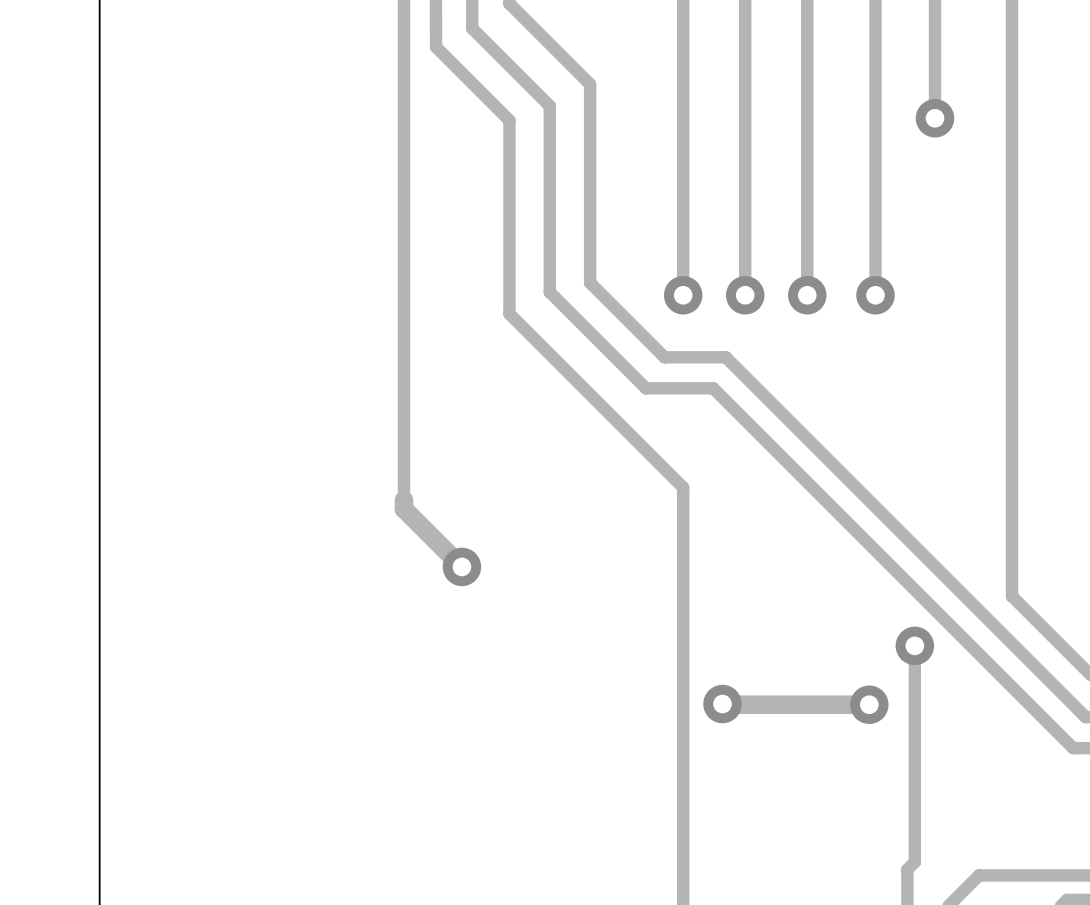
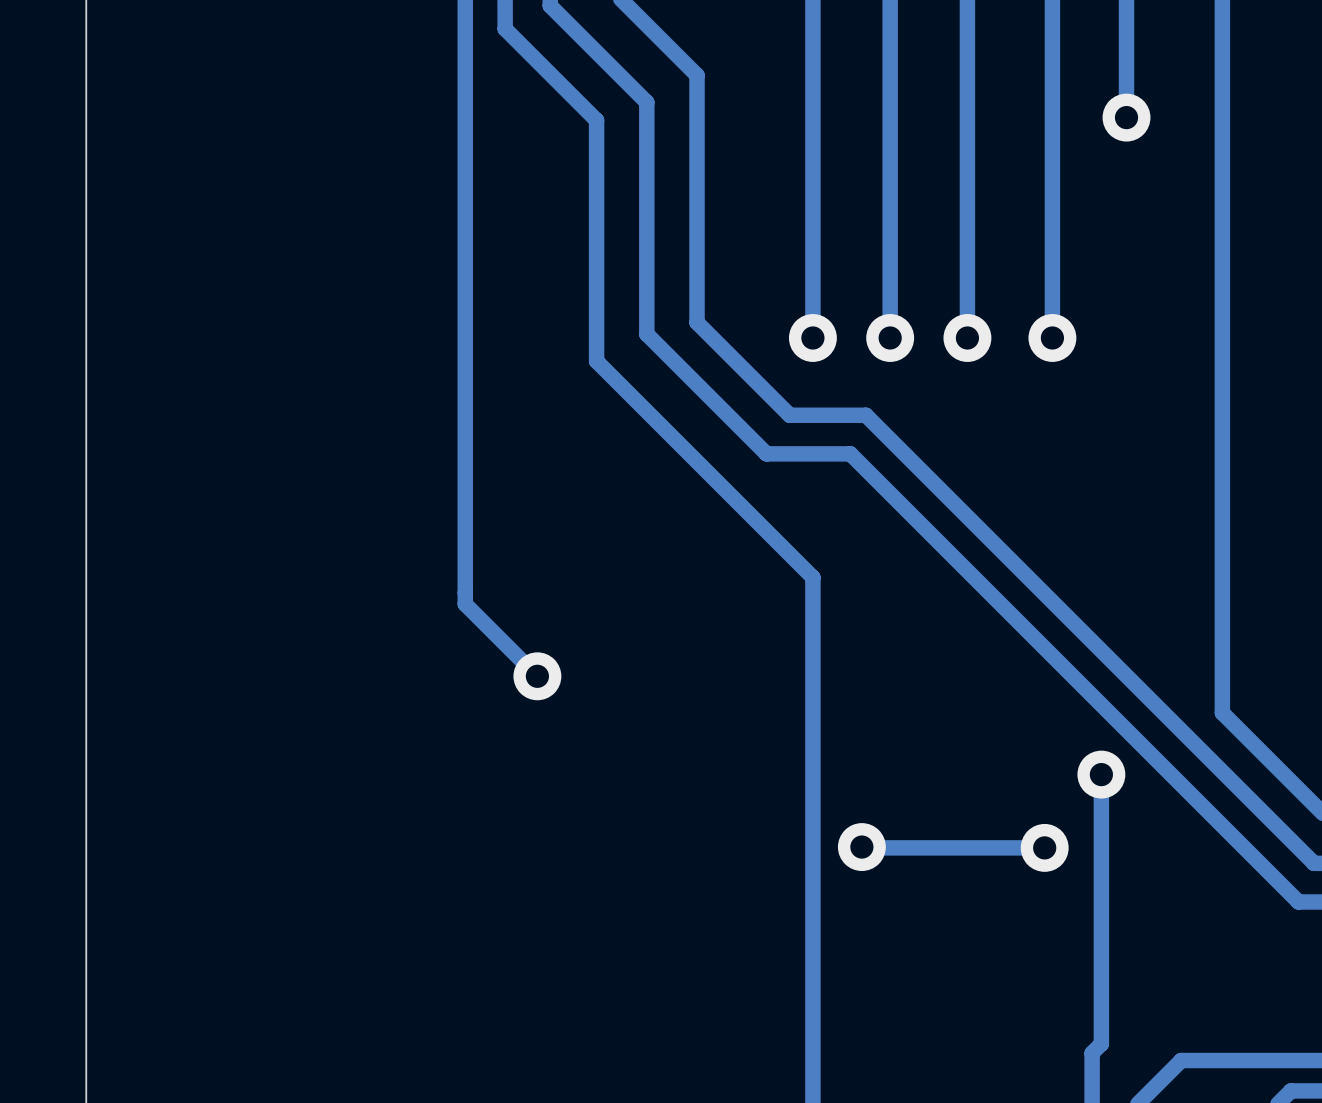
track width: thick (404, 499) (404, 509) (461, 566) -> thin (465, 592) (465, 604) (537, 676)
track width: thick (869, 704) (723, 704) -> thin (1044, 847) (862, 847)

